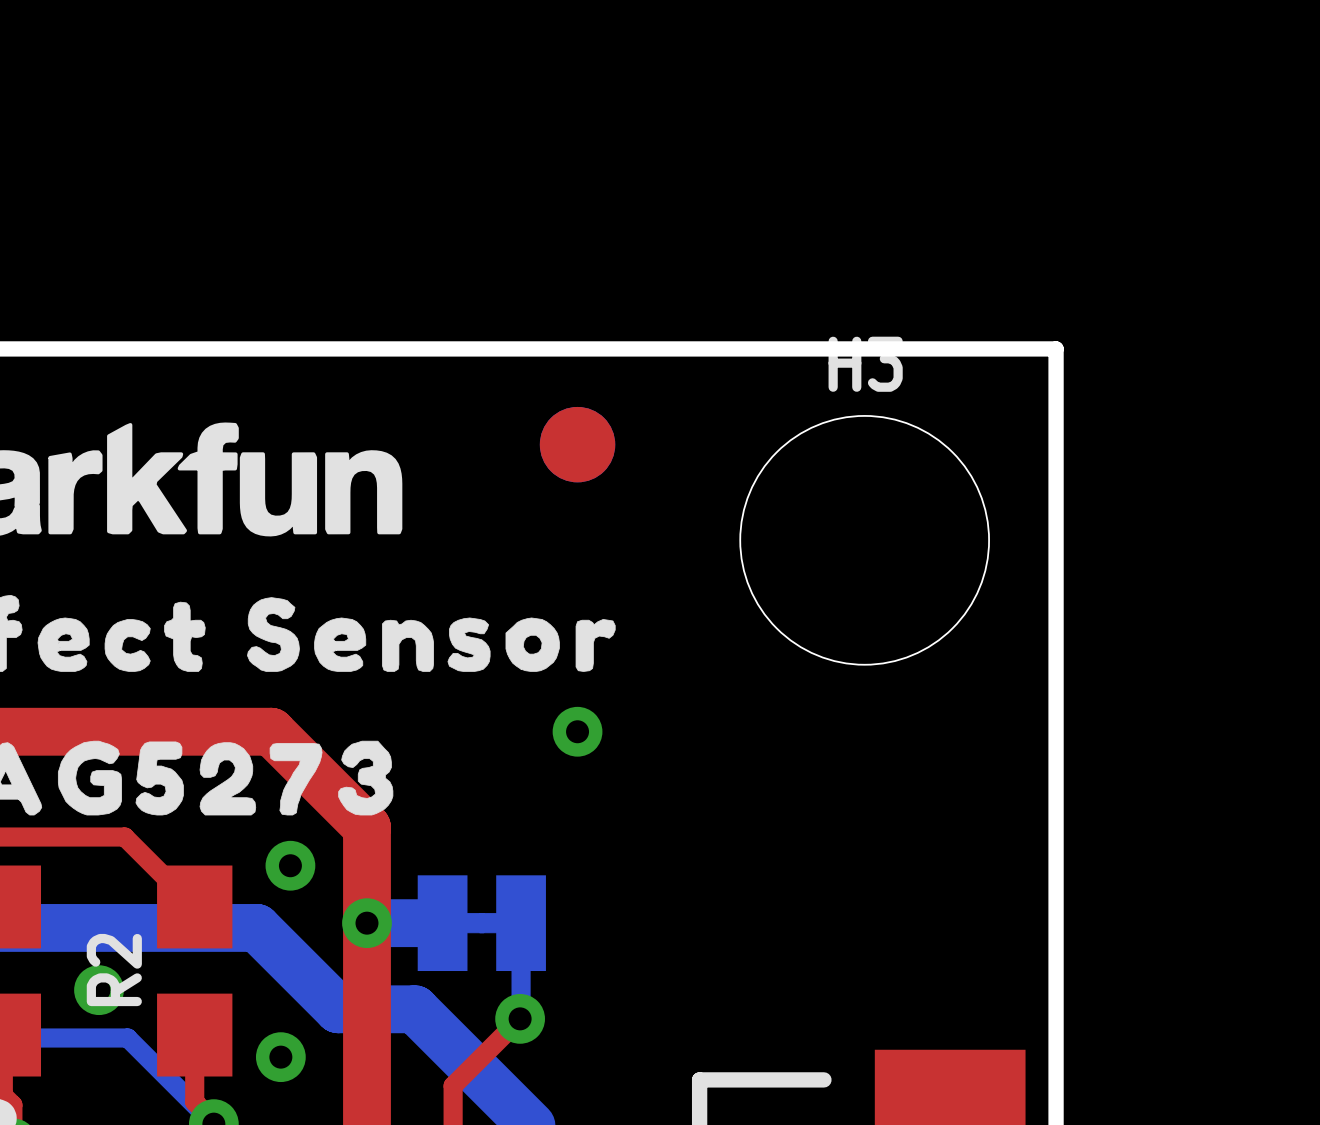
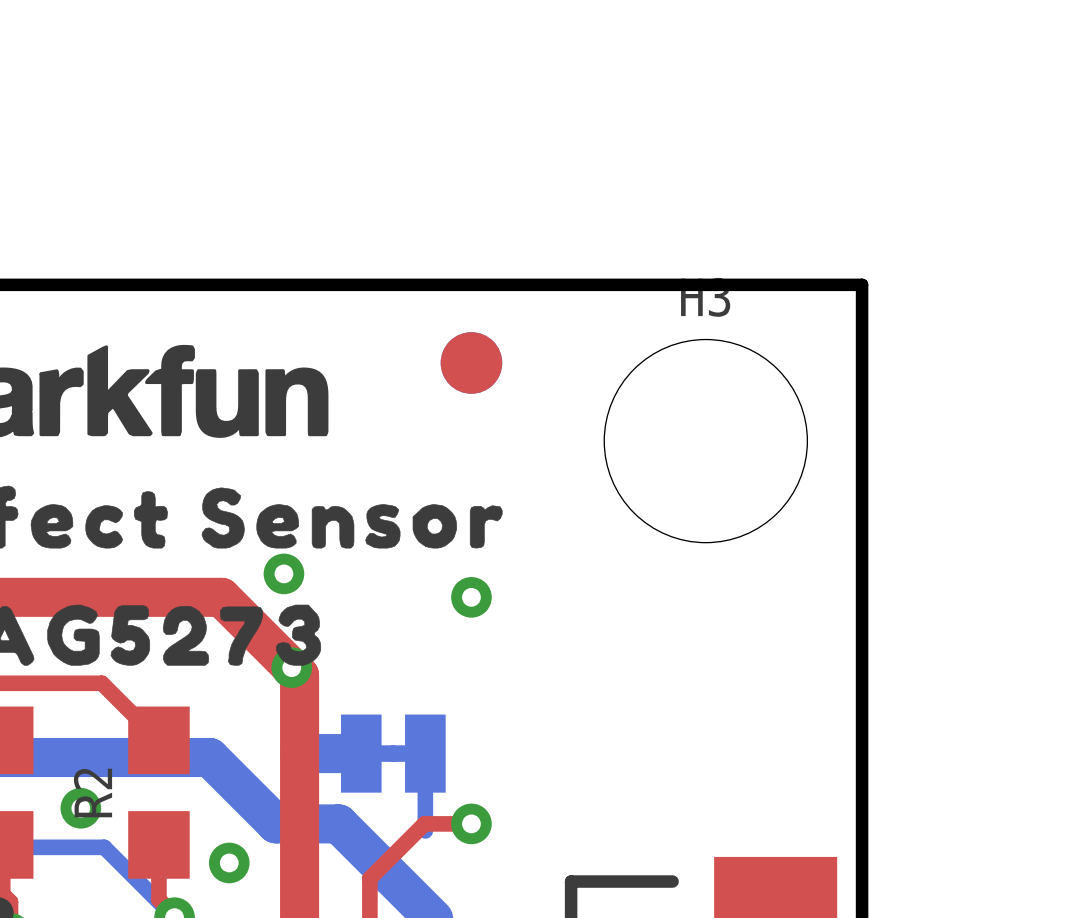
via: none -> (283, 573)
via: none -> (291, 667)
via: (290, 865) -> none
via: (366, 923) -> none
top track: (520, 1018) (453, 1085) -> (471, 823) (424, 823) (369, 878) (369, 886)
via position: (520, 1018) -> (471, 823)

